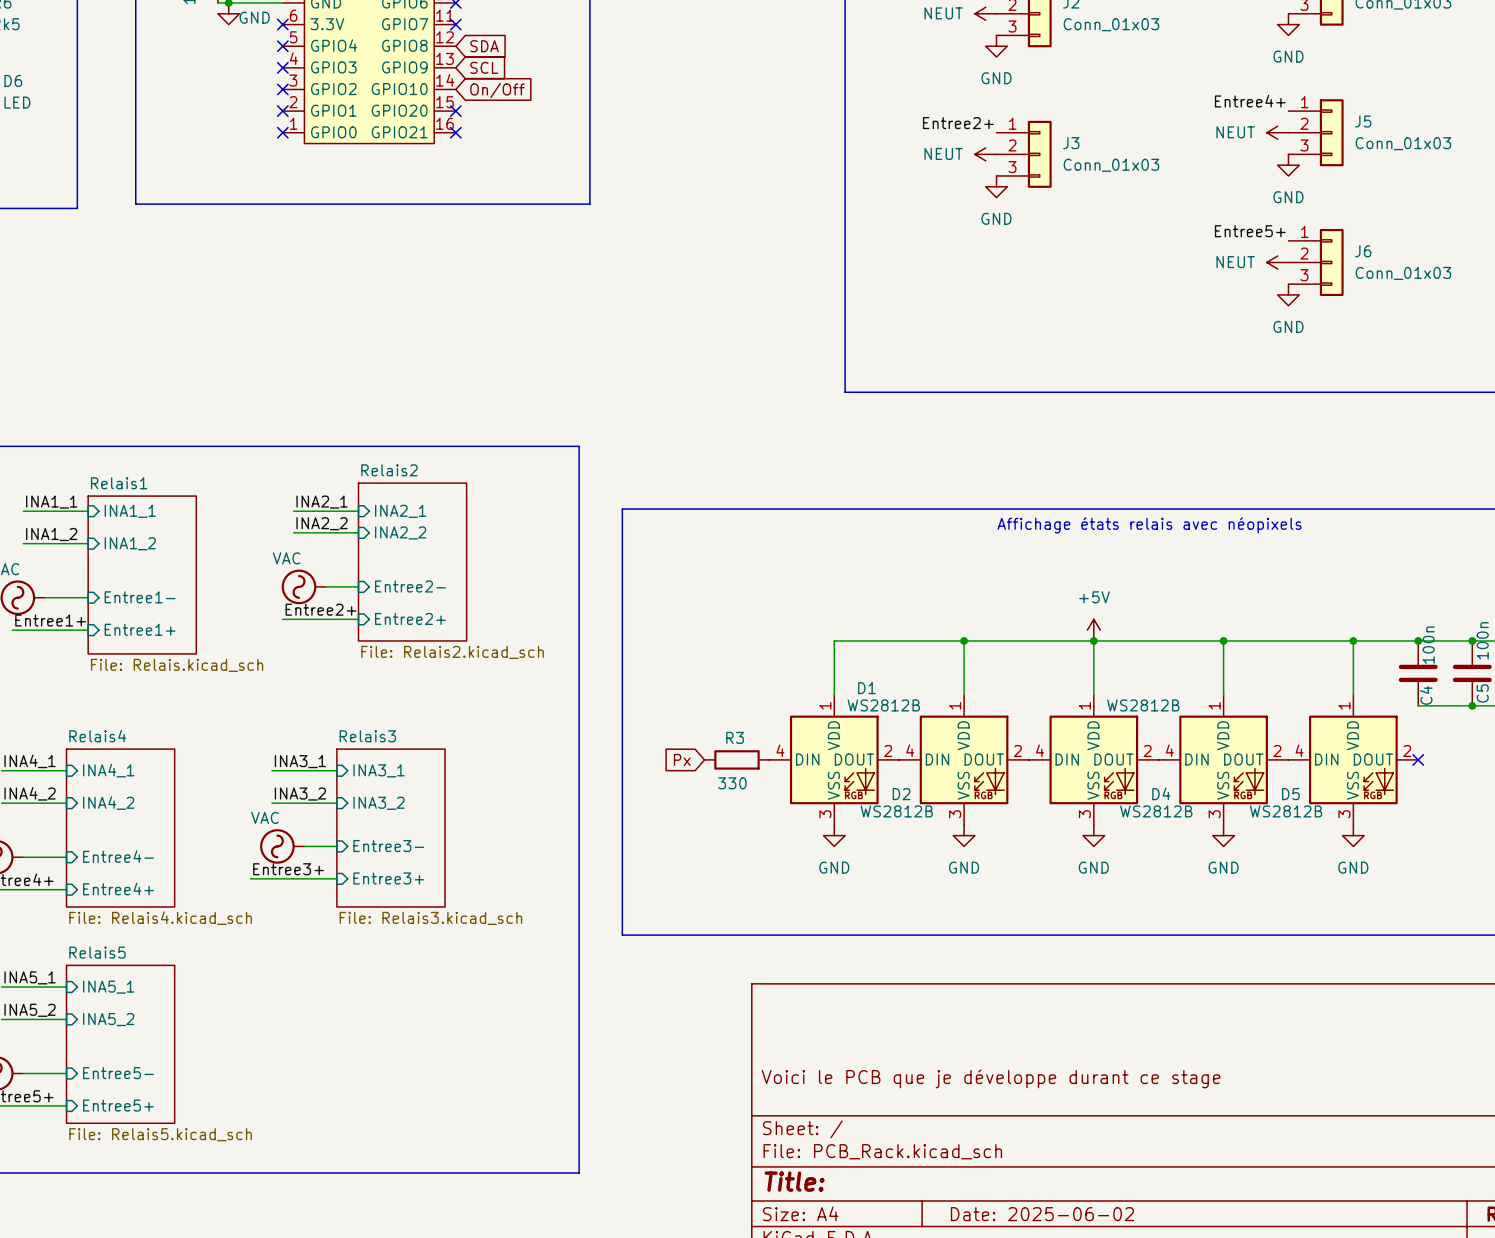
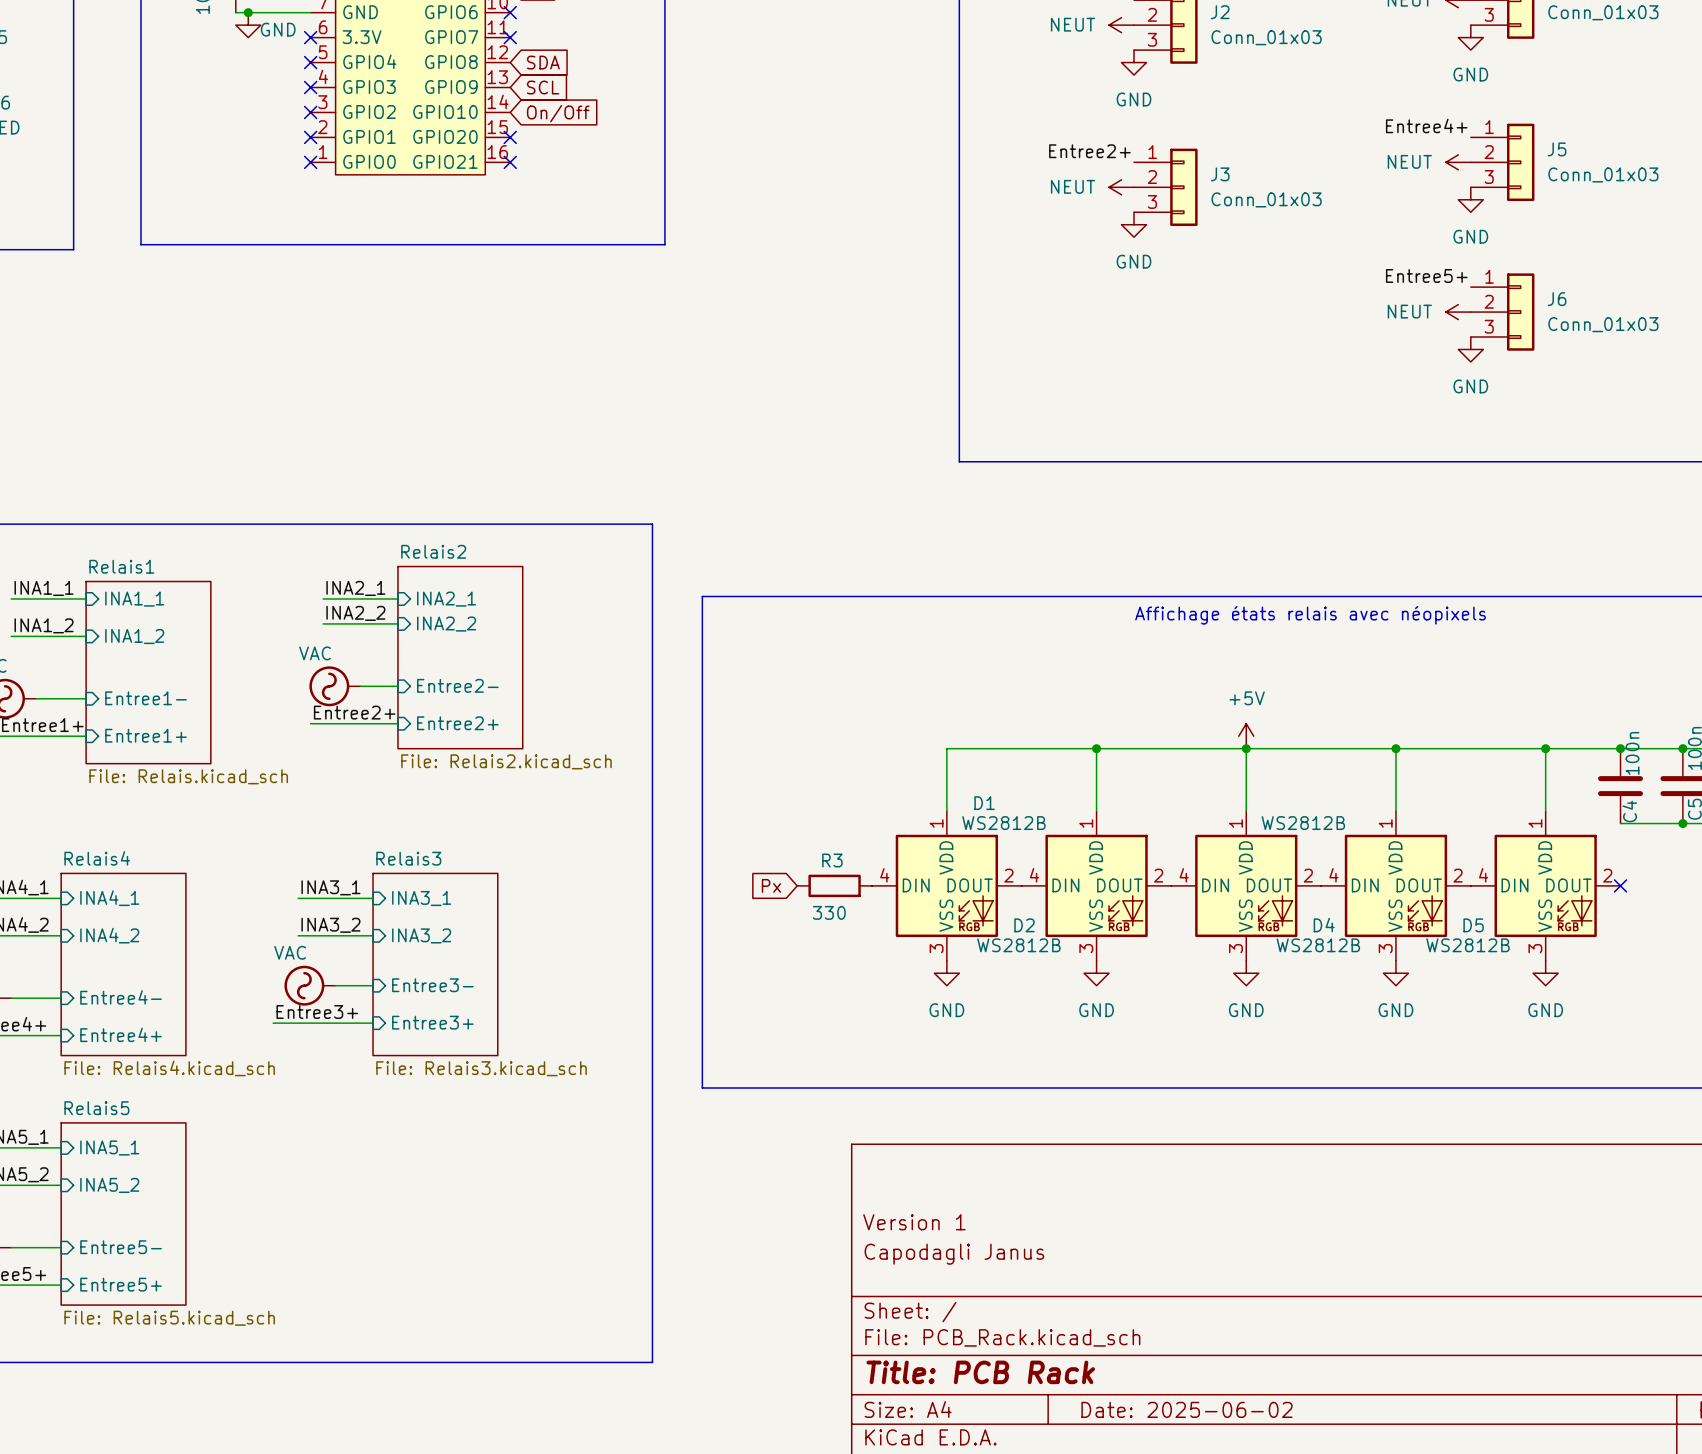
title block: none -> Version 1 (914, 1222)
title block: Voici le PCB que je développe durant ce stage (991, 1078) -> Capodagli Janus (954, 1254)
title block: Title: (794, 1181) -> Title: PCB Rack (980, 1372)

